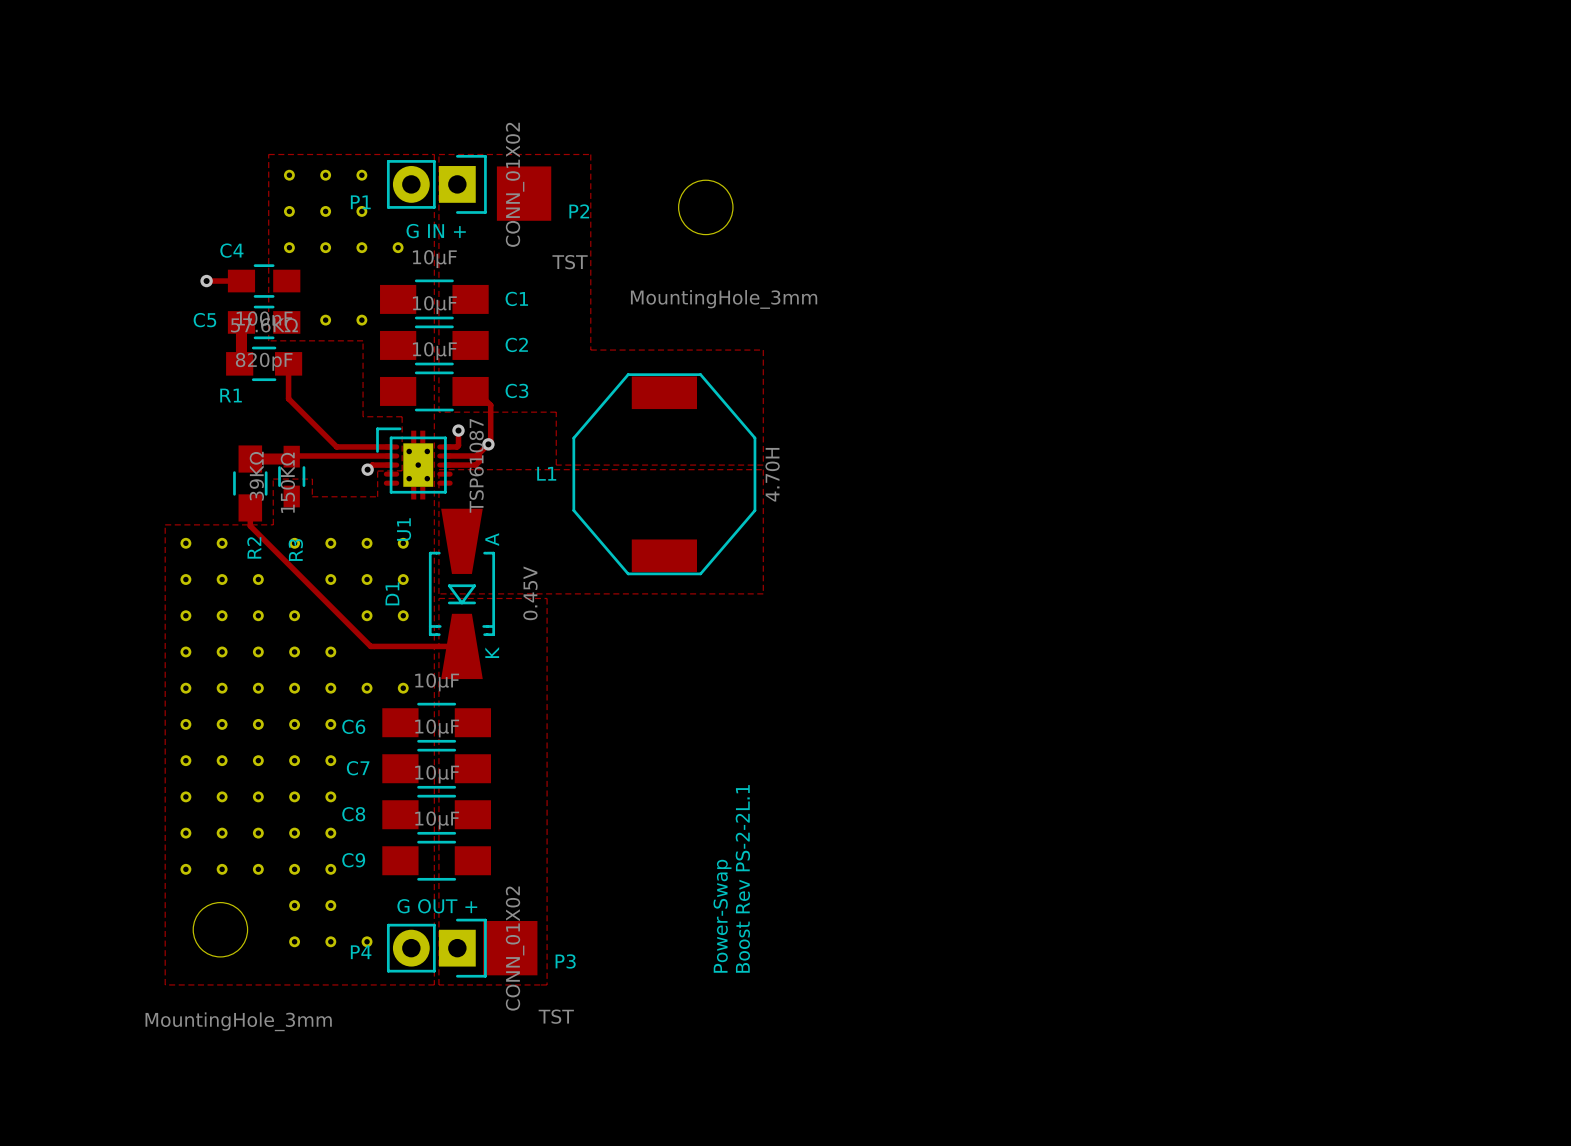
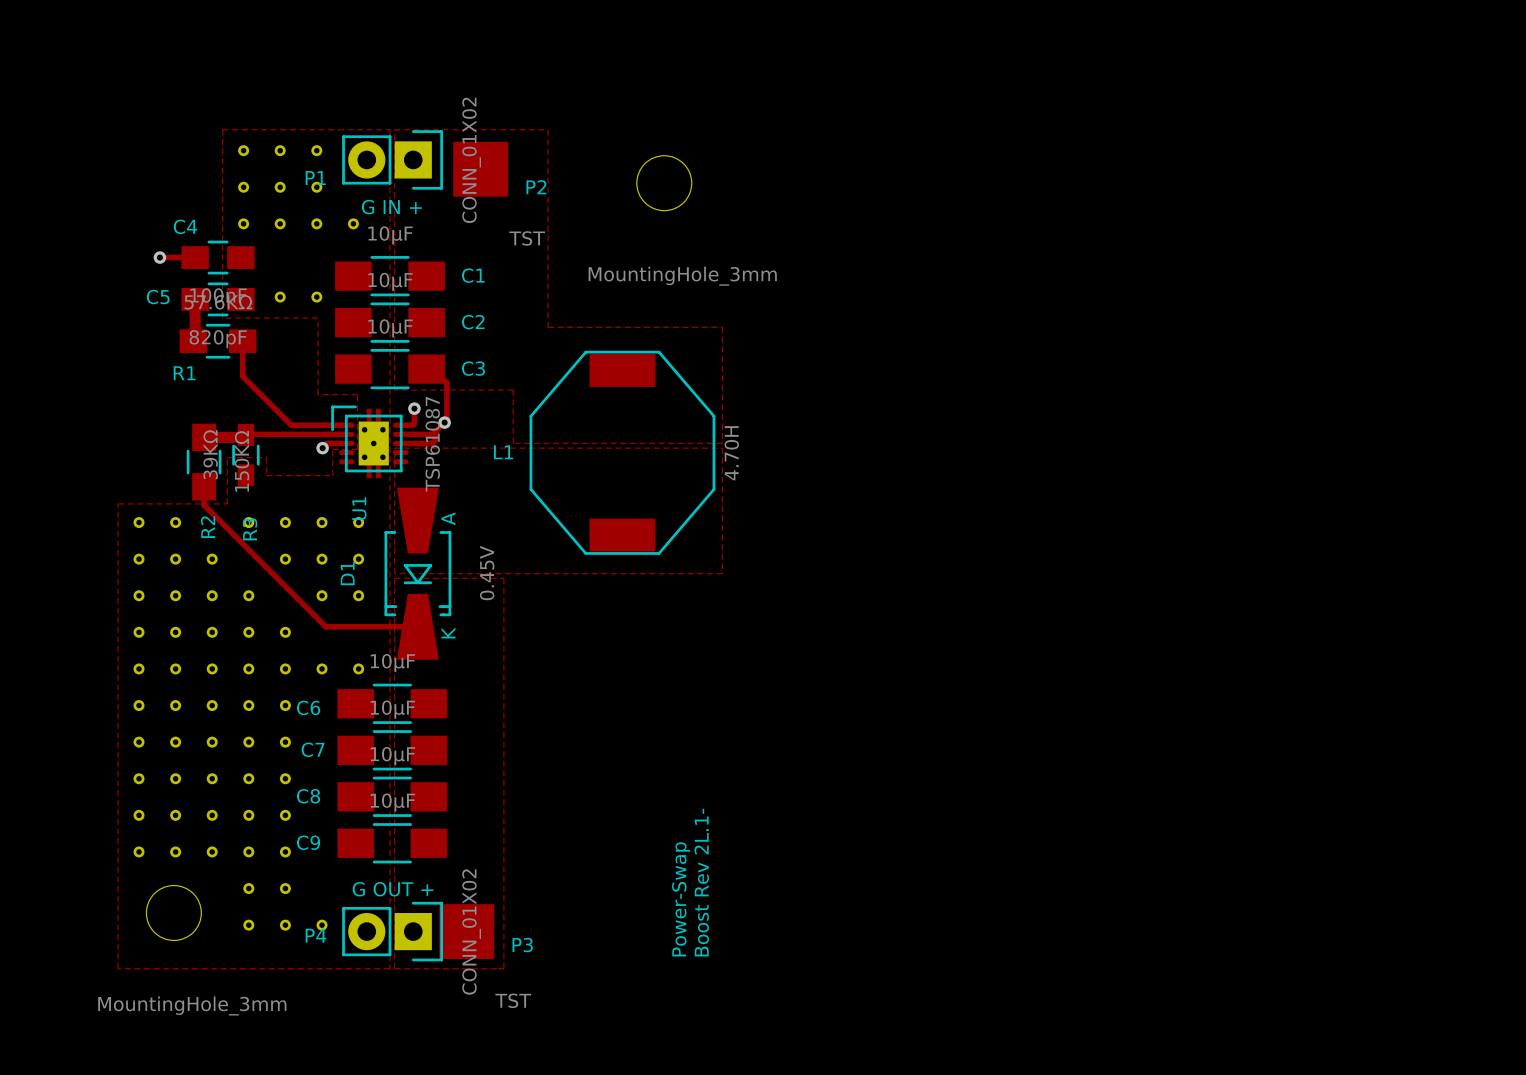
text: Boost Rev PS-2-2L.1 (742, 878) -> Boost Rev 2L.1- (701, 882)

